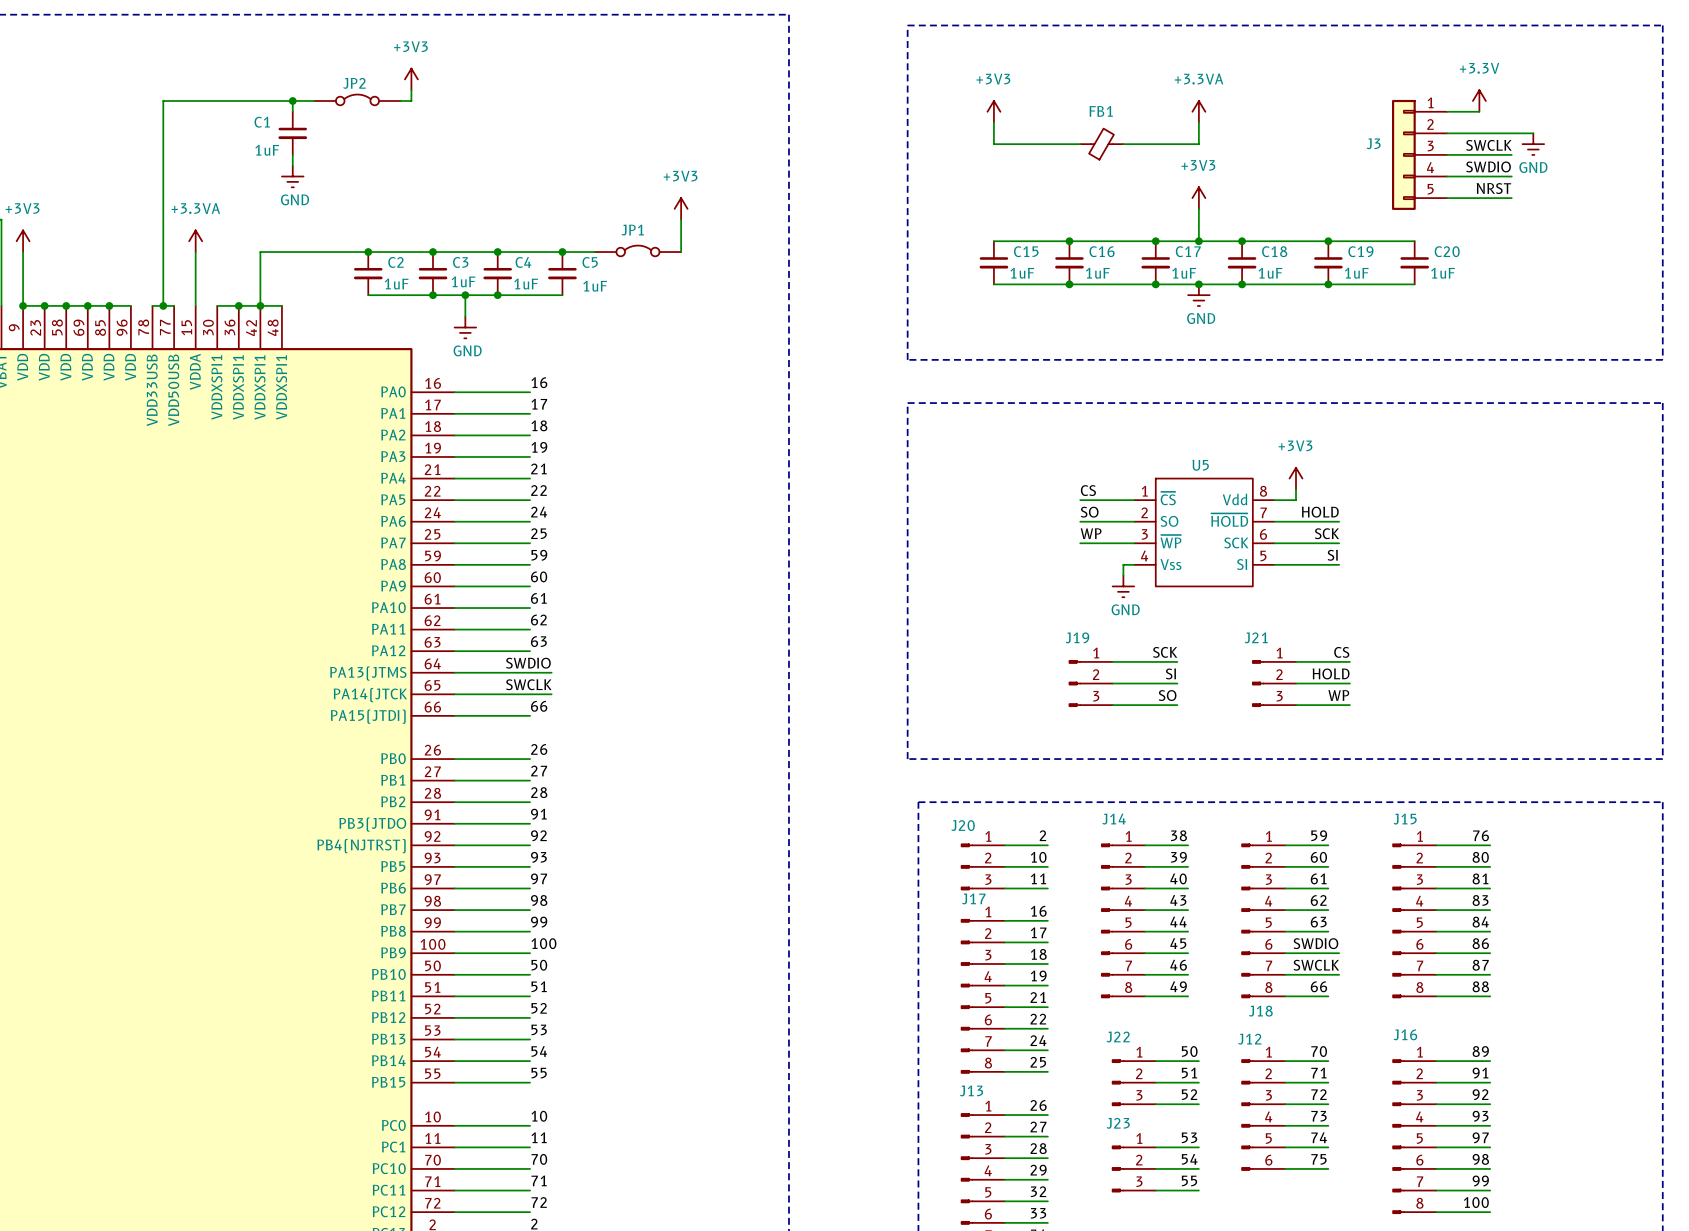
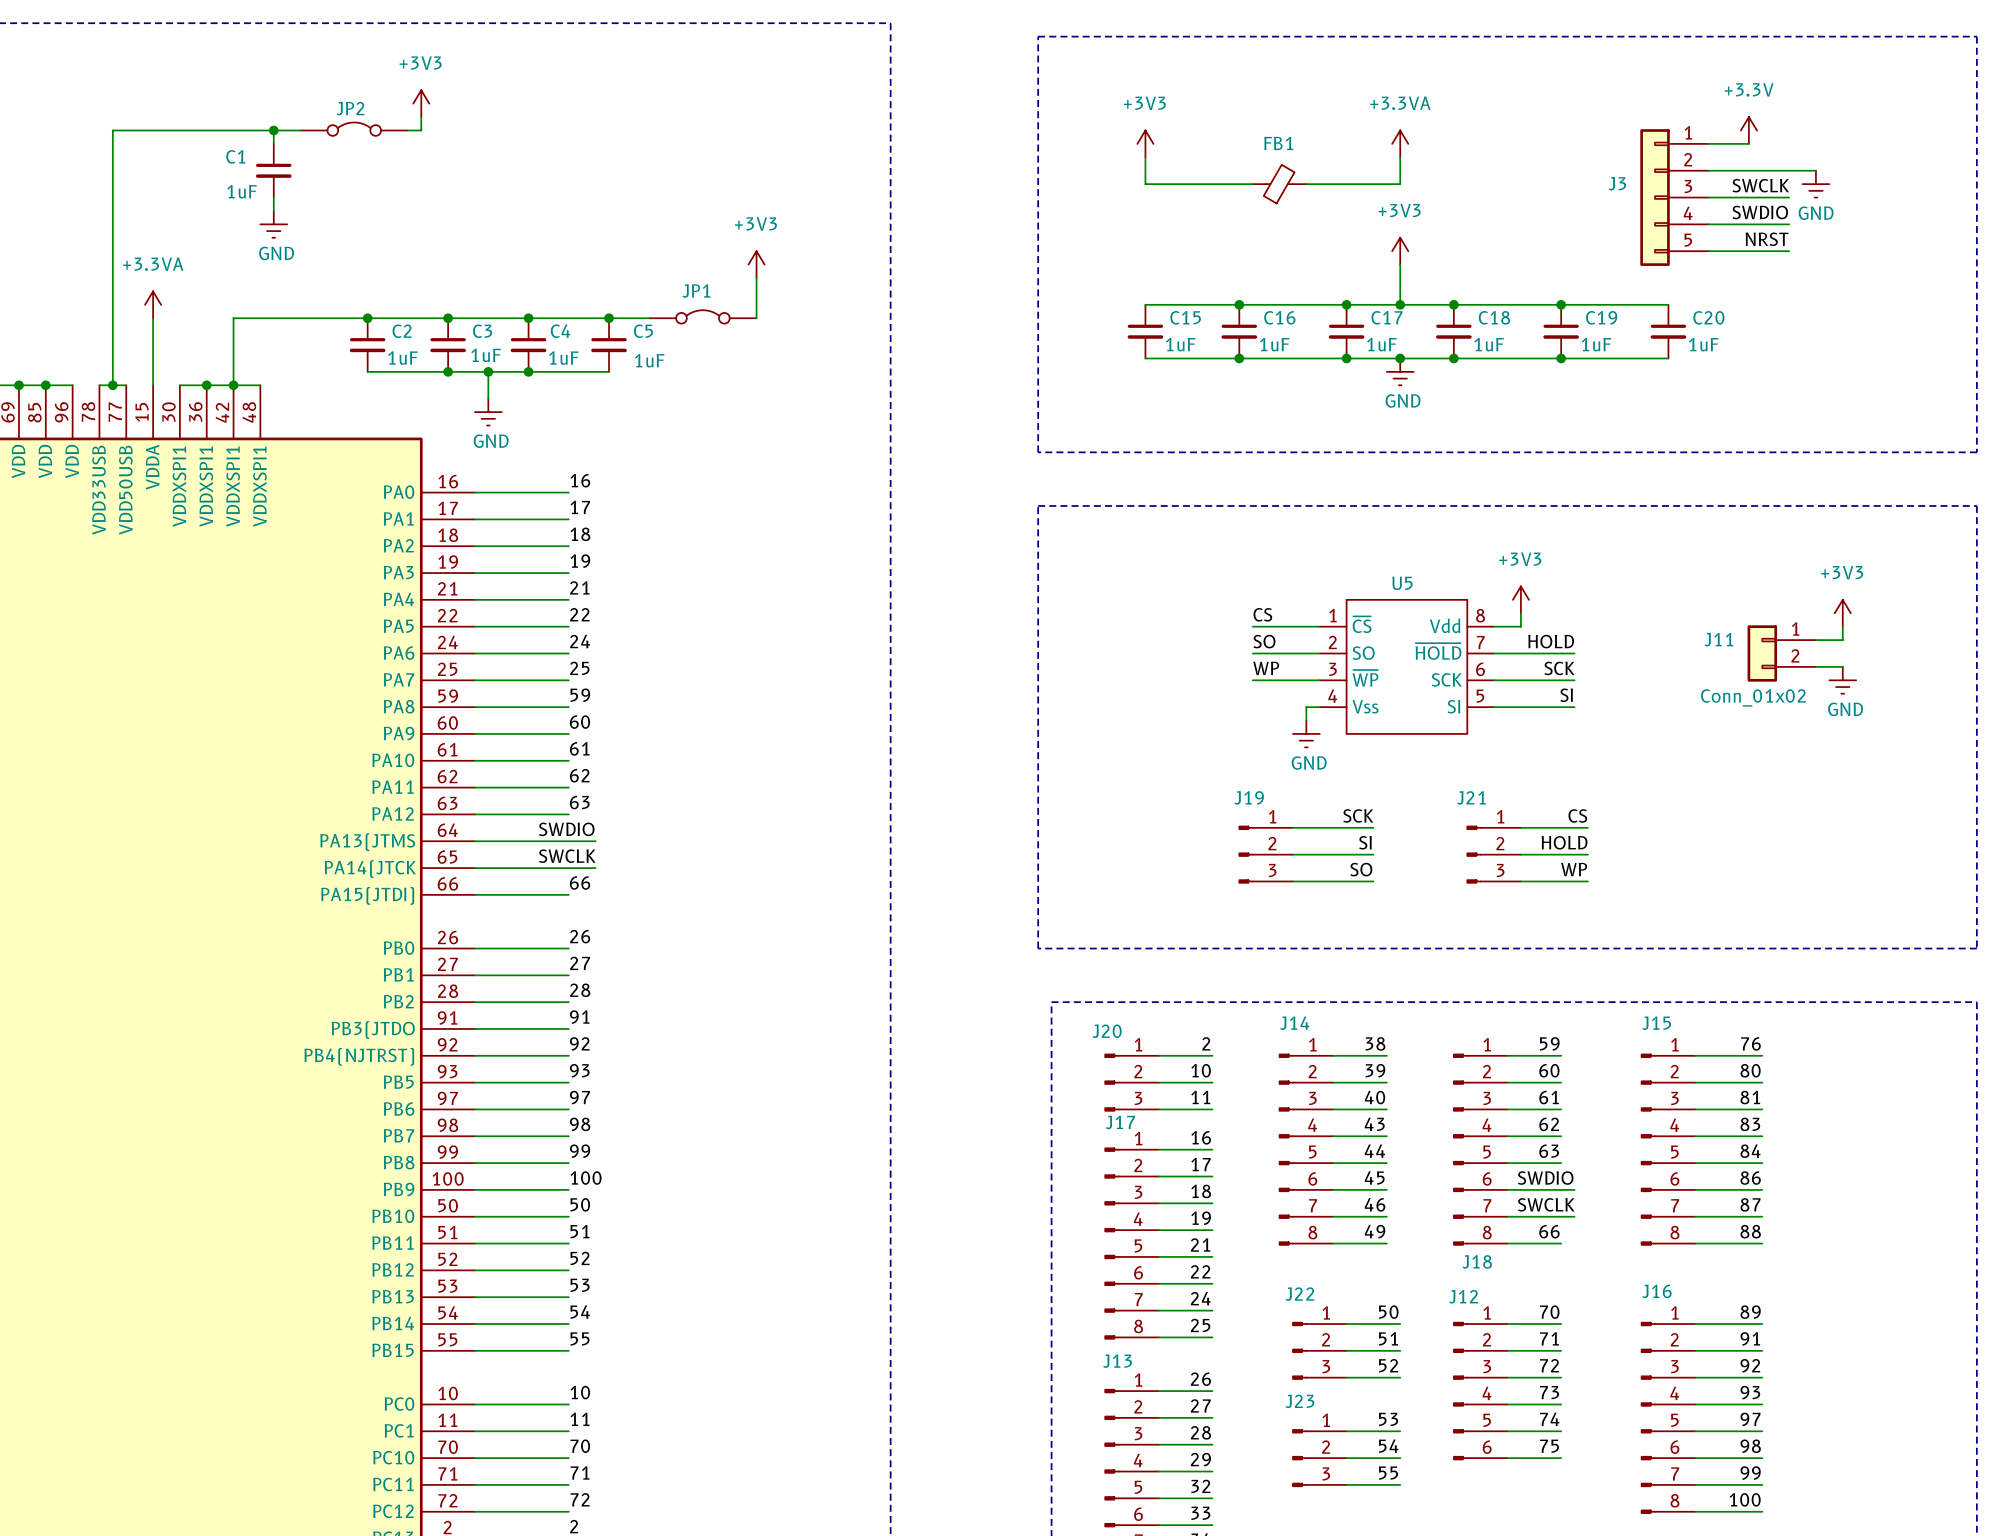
power symbol: none -> +3V3 (1842, 613)
wire: none -> (1842, 626) (1842, 640) (1815, 640)
J11: none -> Conn_01x02 (1781, 653)
wire: none -> (1815, 666) (1842, 666)
power symbol: none -> GND (1842, 680)

